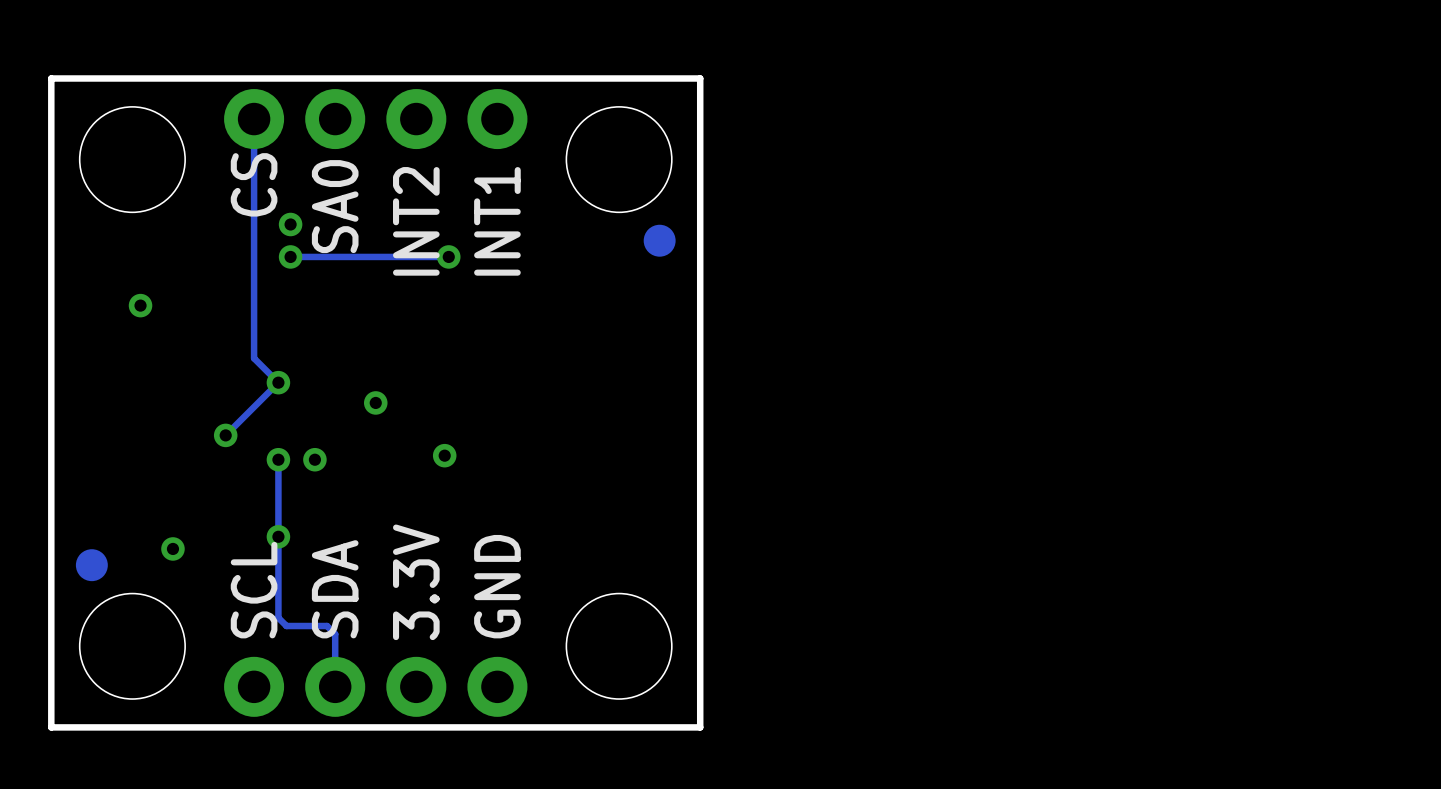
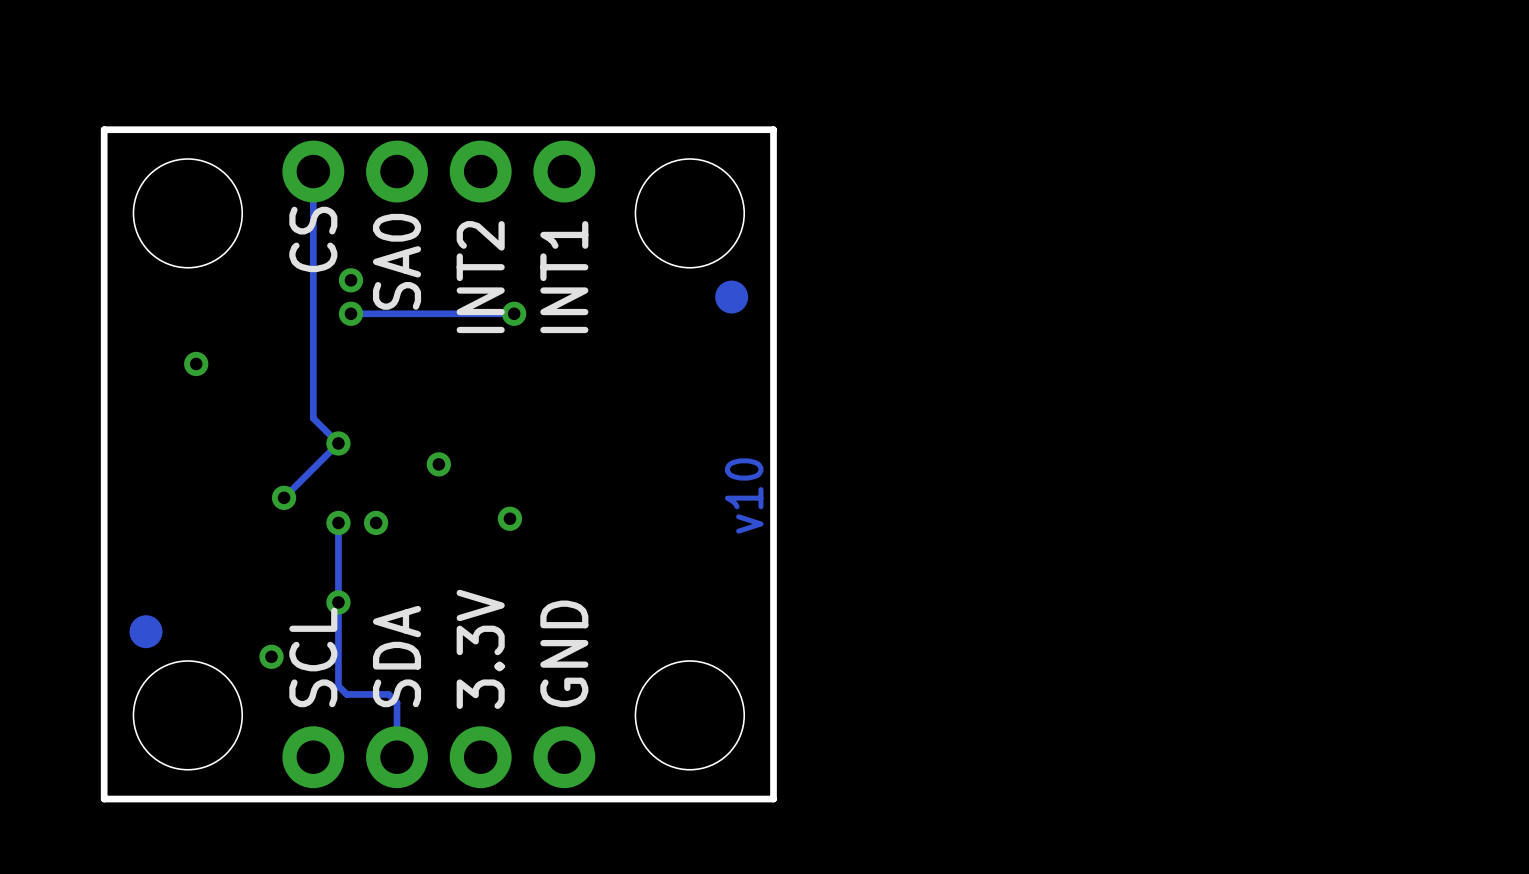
text: none -> v10 (744, 496)
via position: (172, 548) -> (271, 656)

